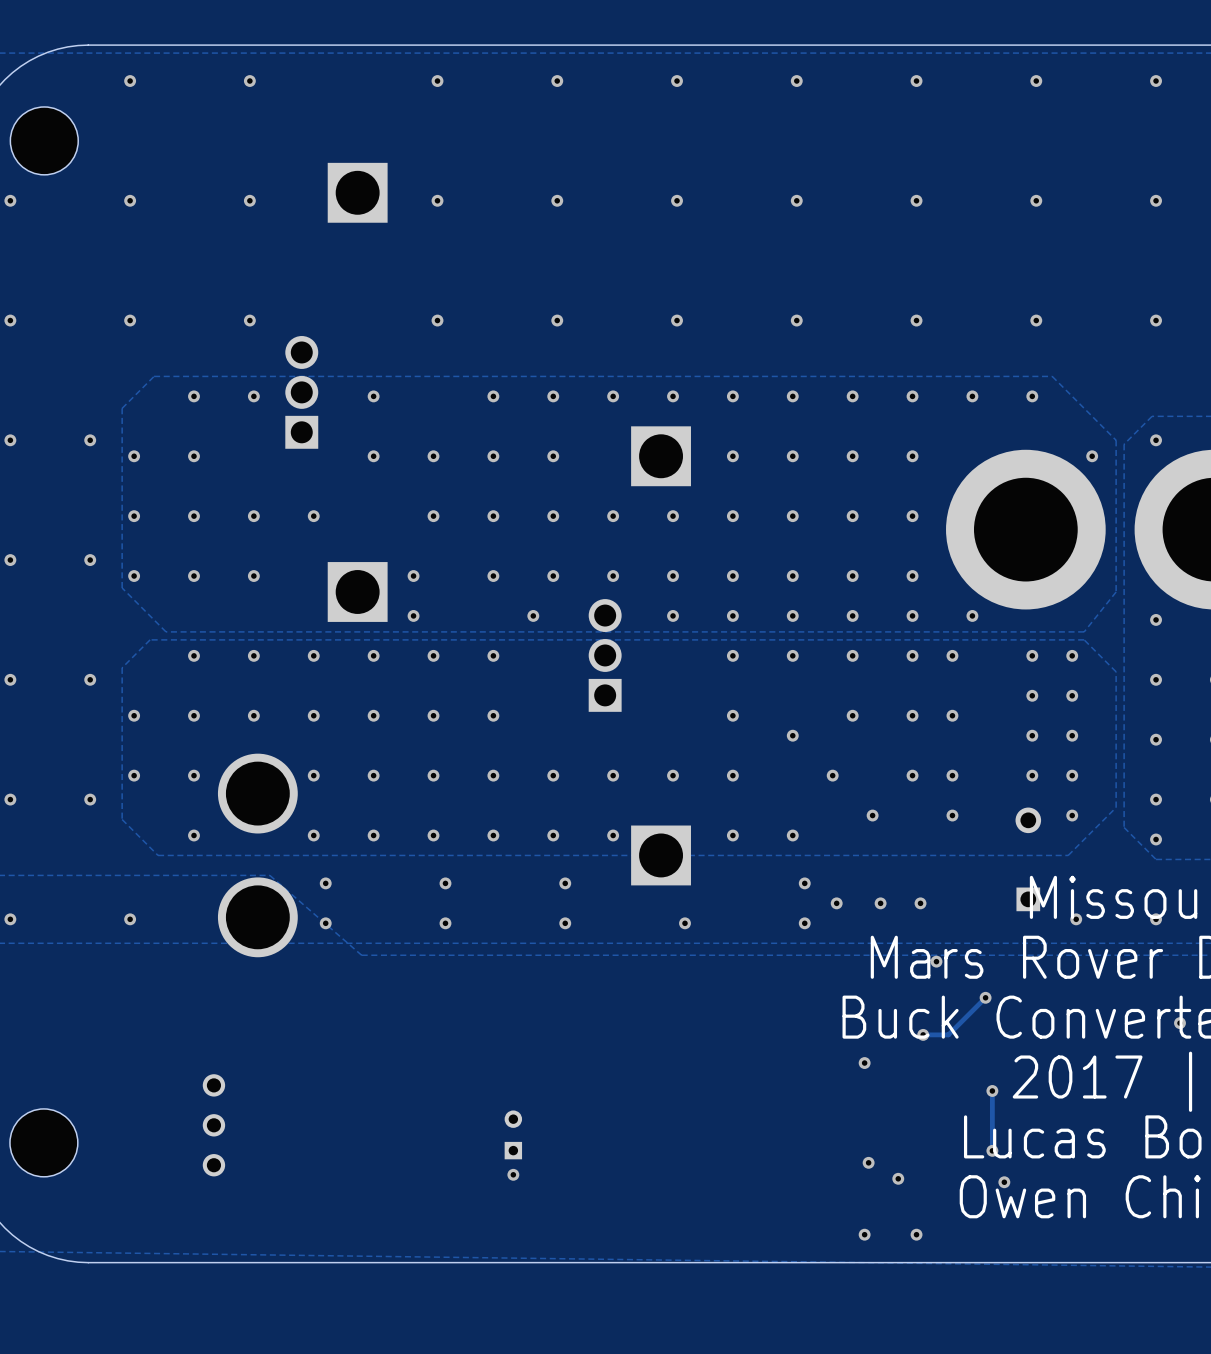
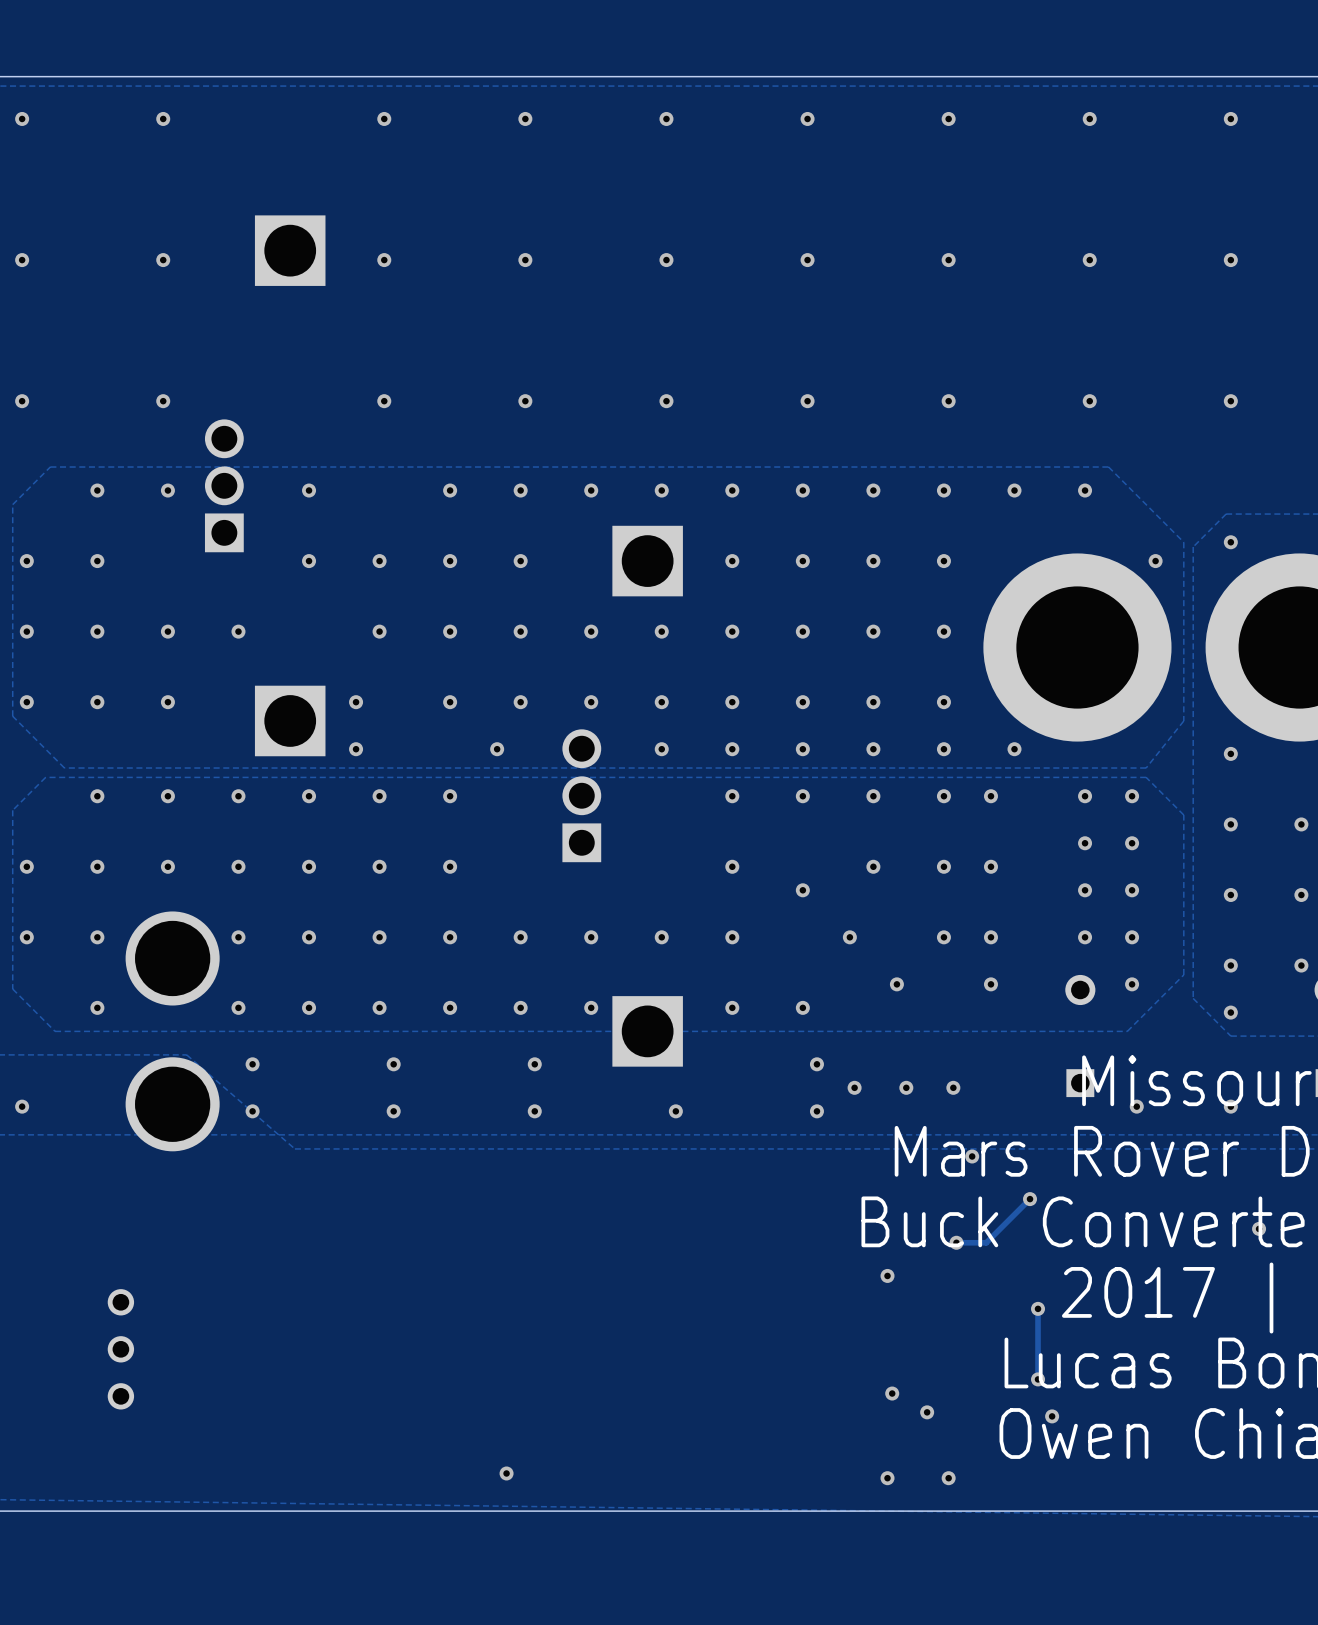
part: (513, 1134) -> none
via position: (513, 1174) -> (506, 1473)

